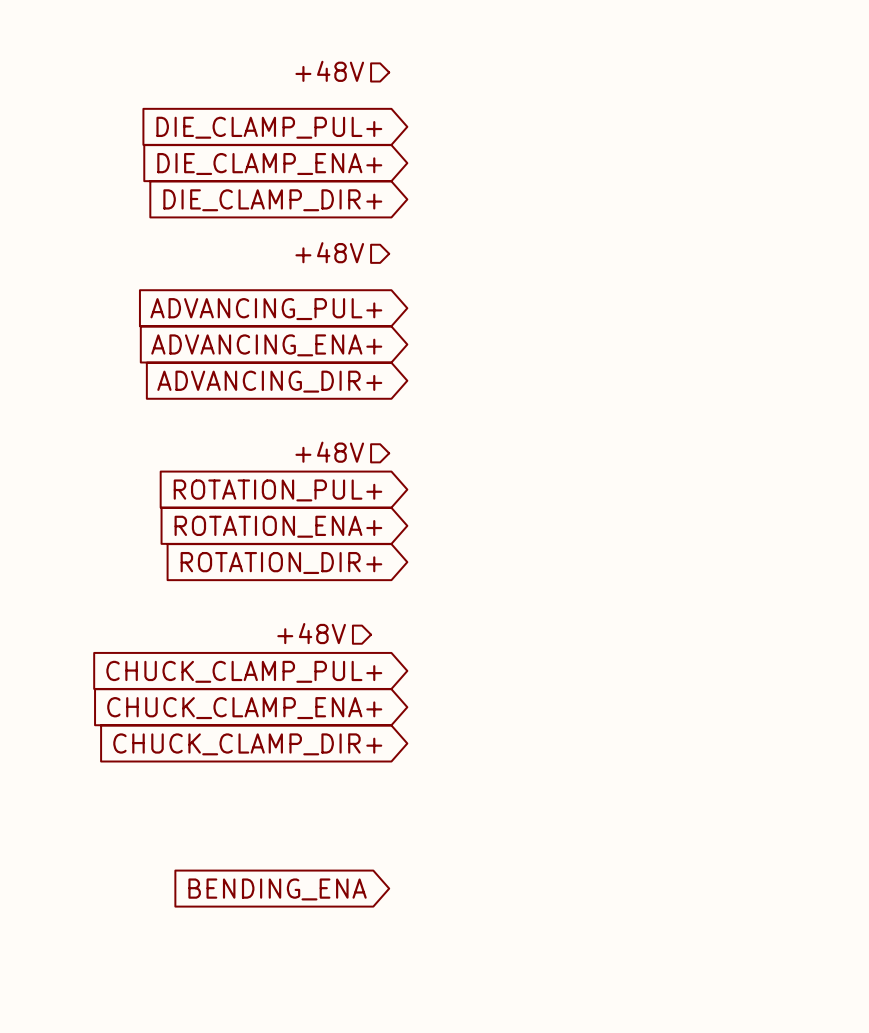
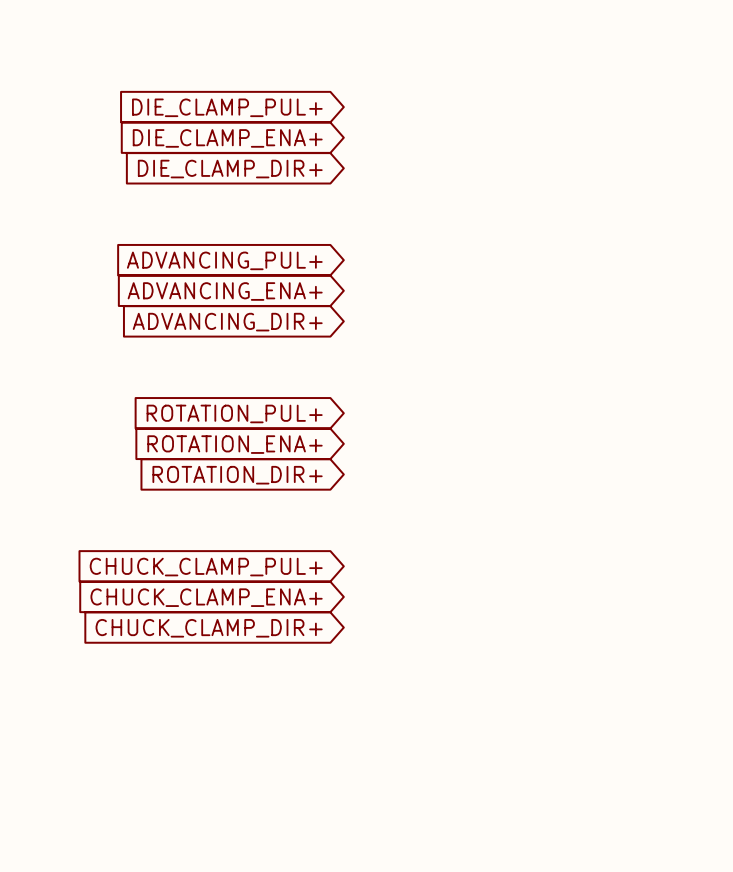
hierarchical label: +48V (329, 71) -> none
hierarchical label: +48V (329, 252) -> none
hierarchical label: +48V (329, 452) -> none
hierarchical label: +48V (311, 633) -> none
global label: BENDING_ENA (277, 889) -> none

